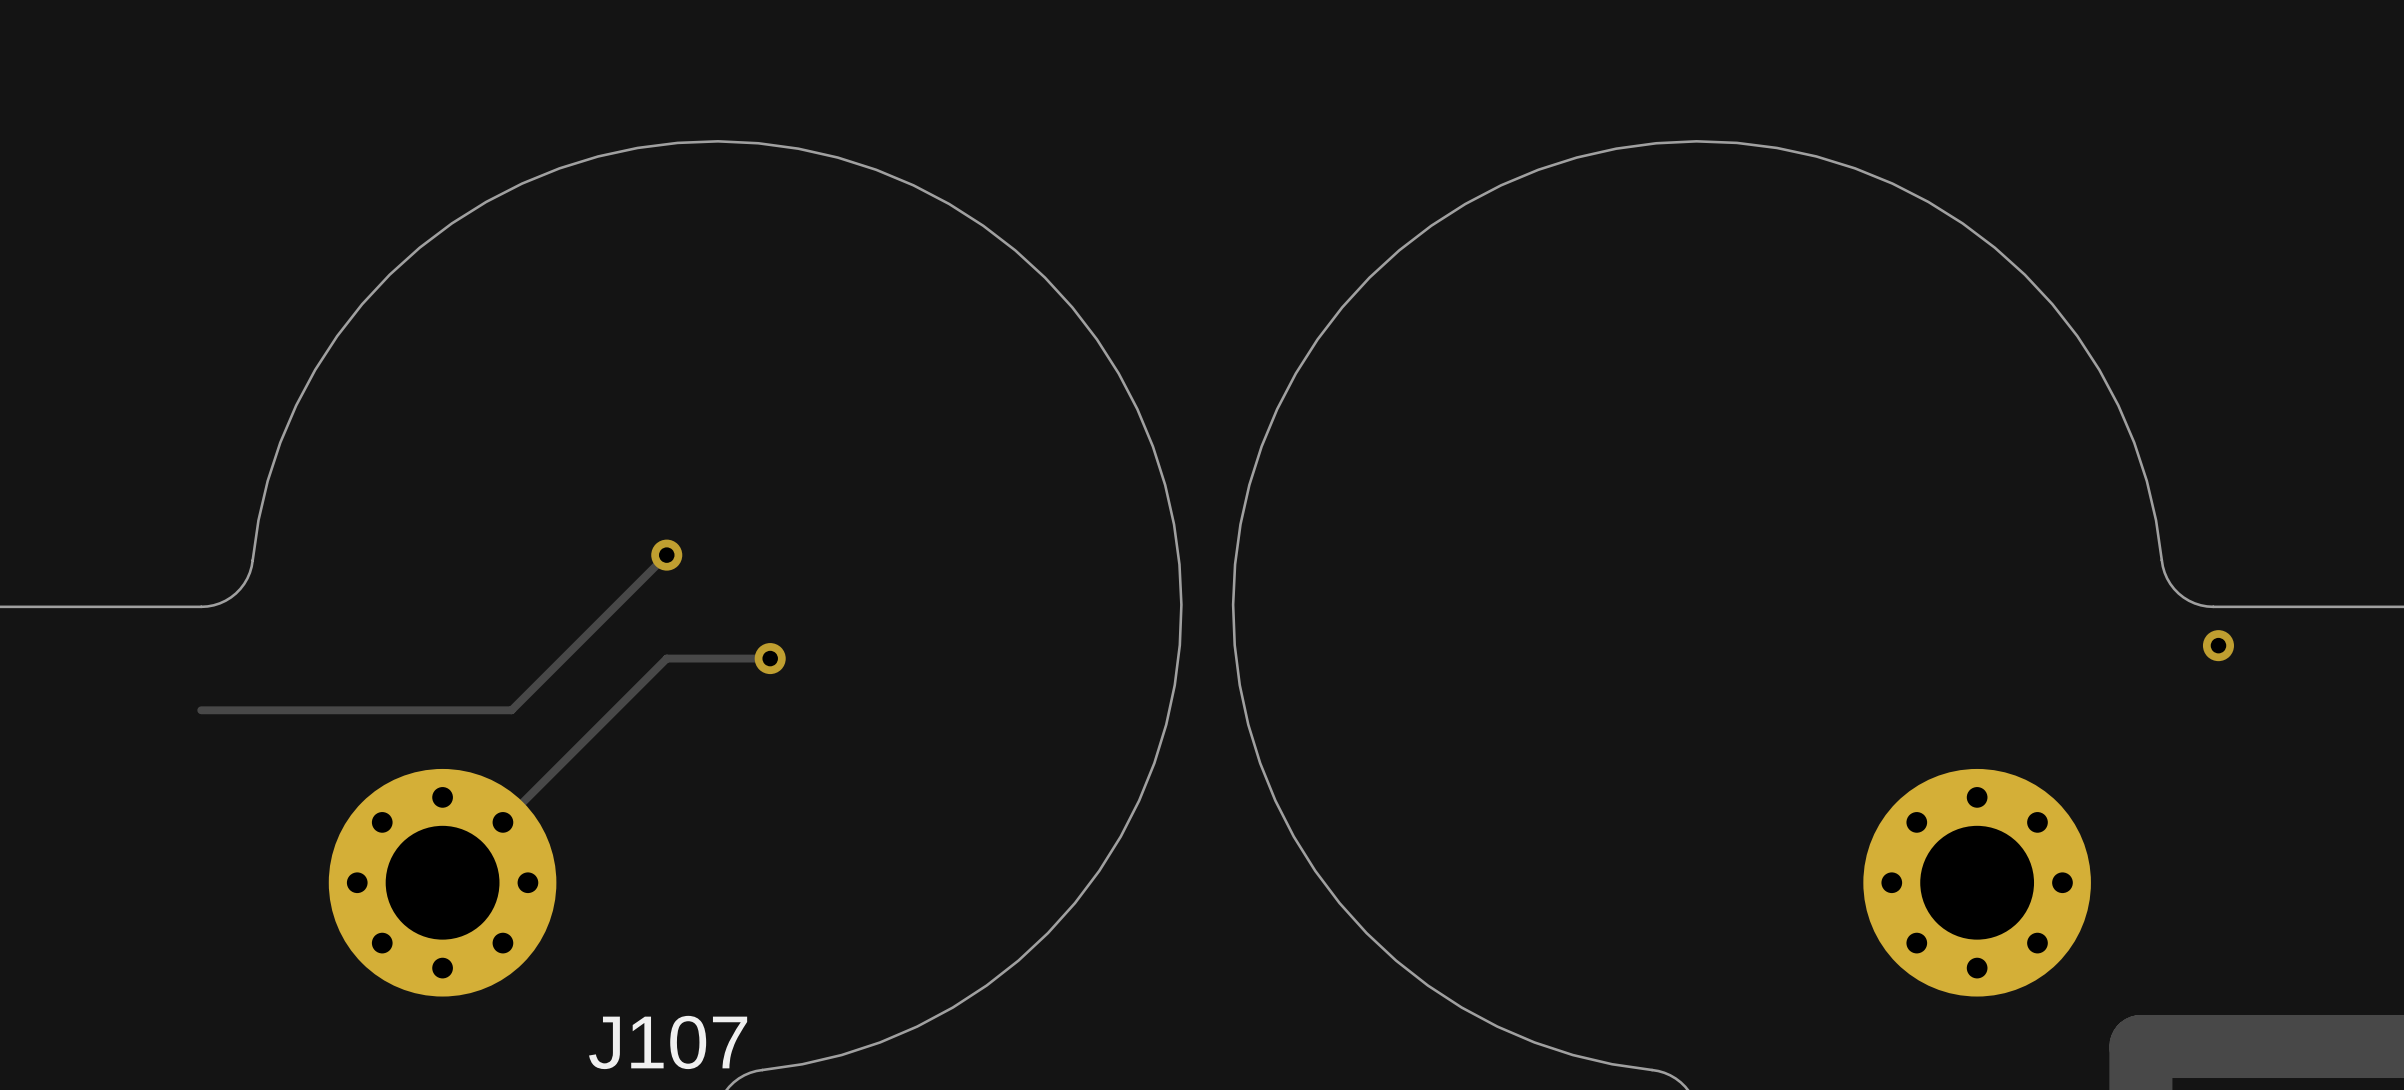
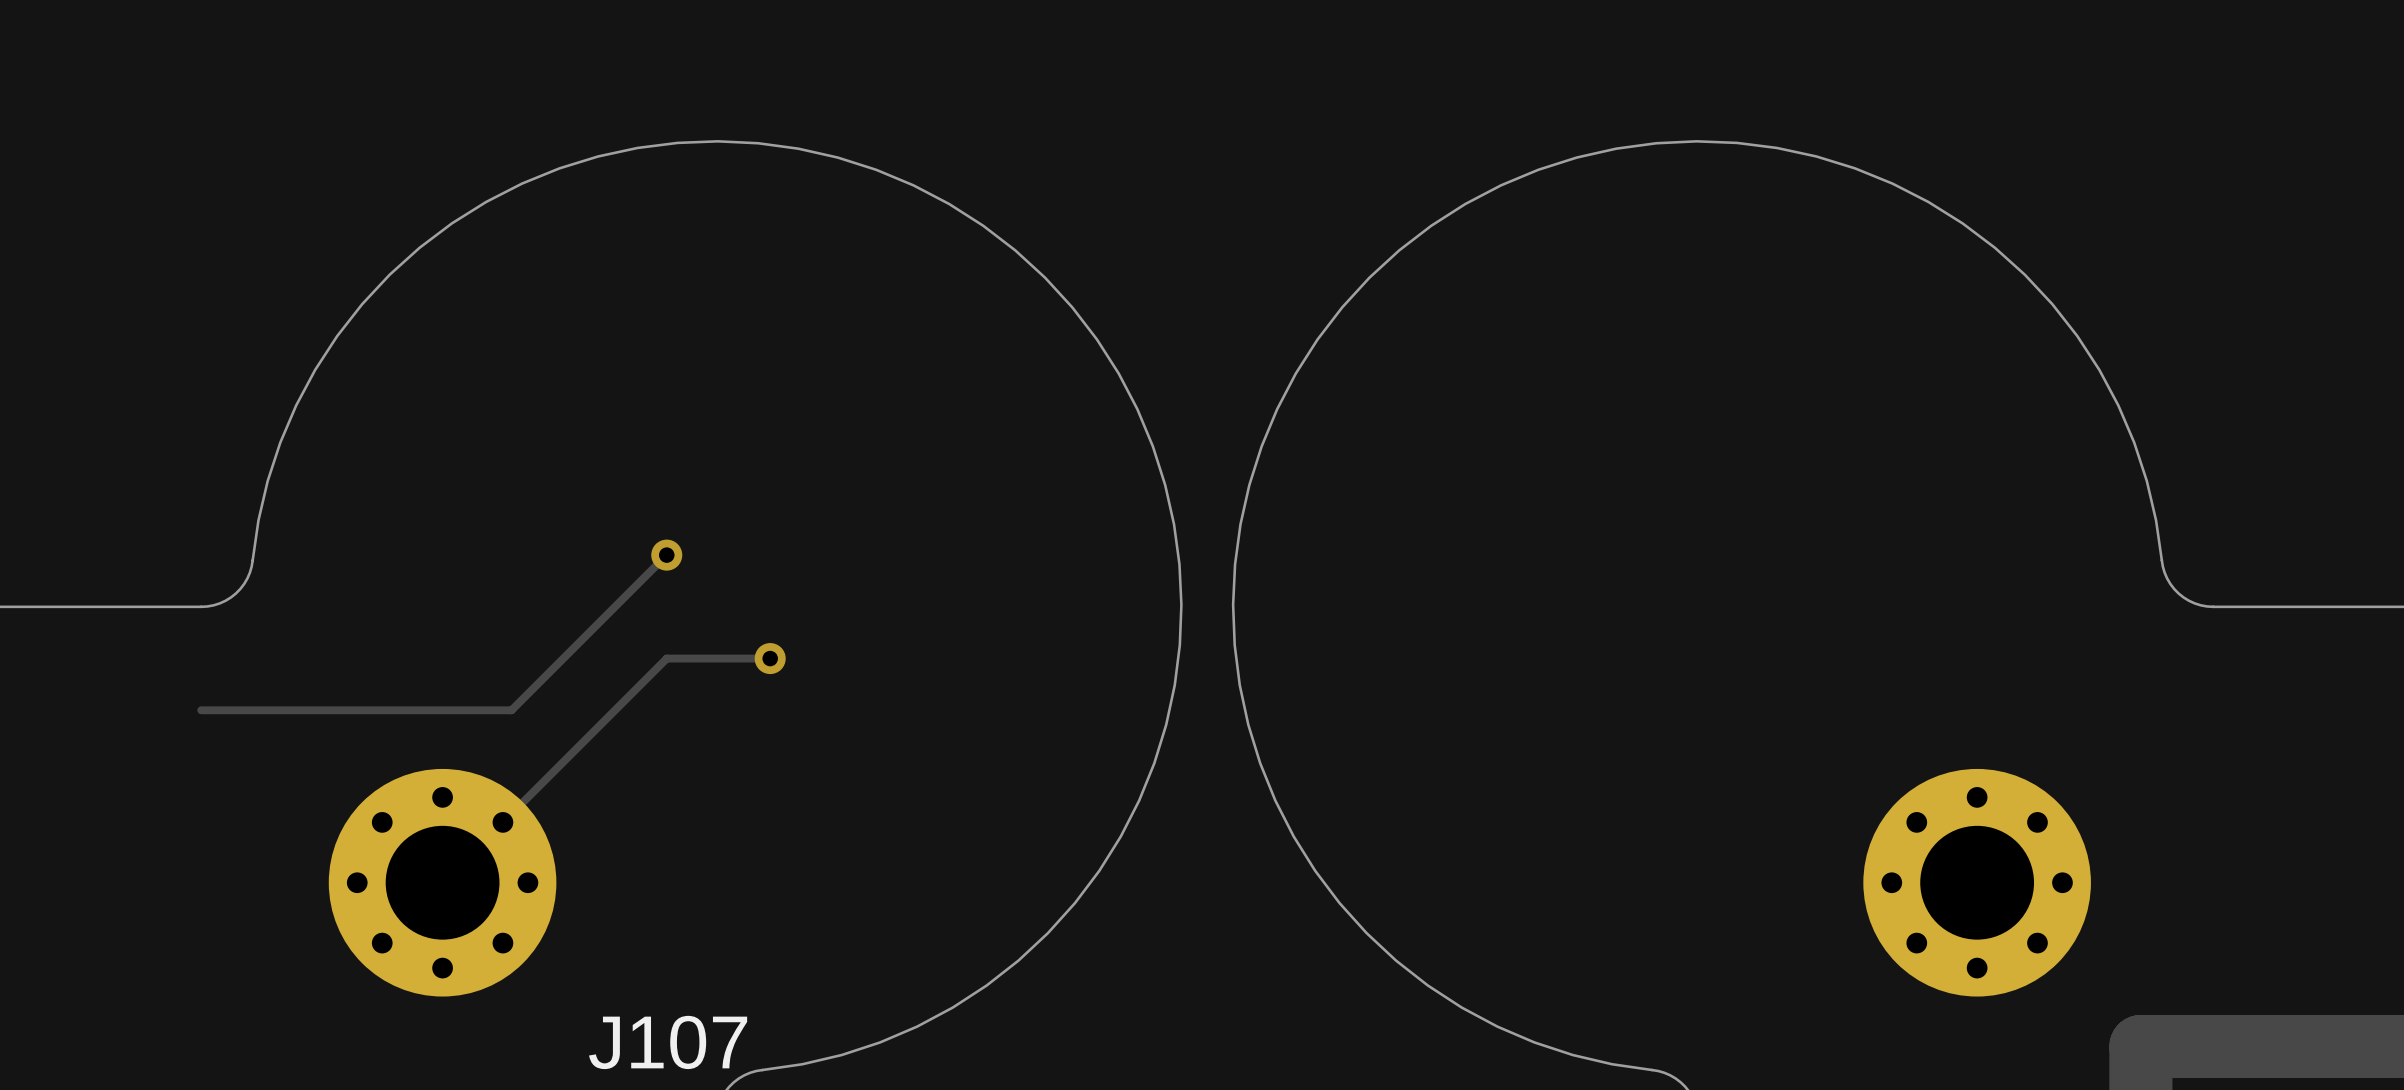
via: (2218, 645) -> none

